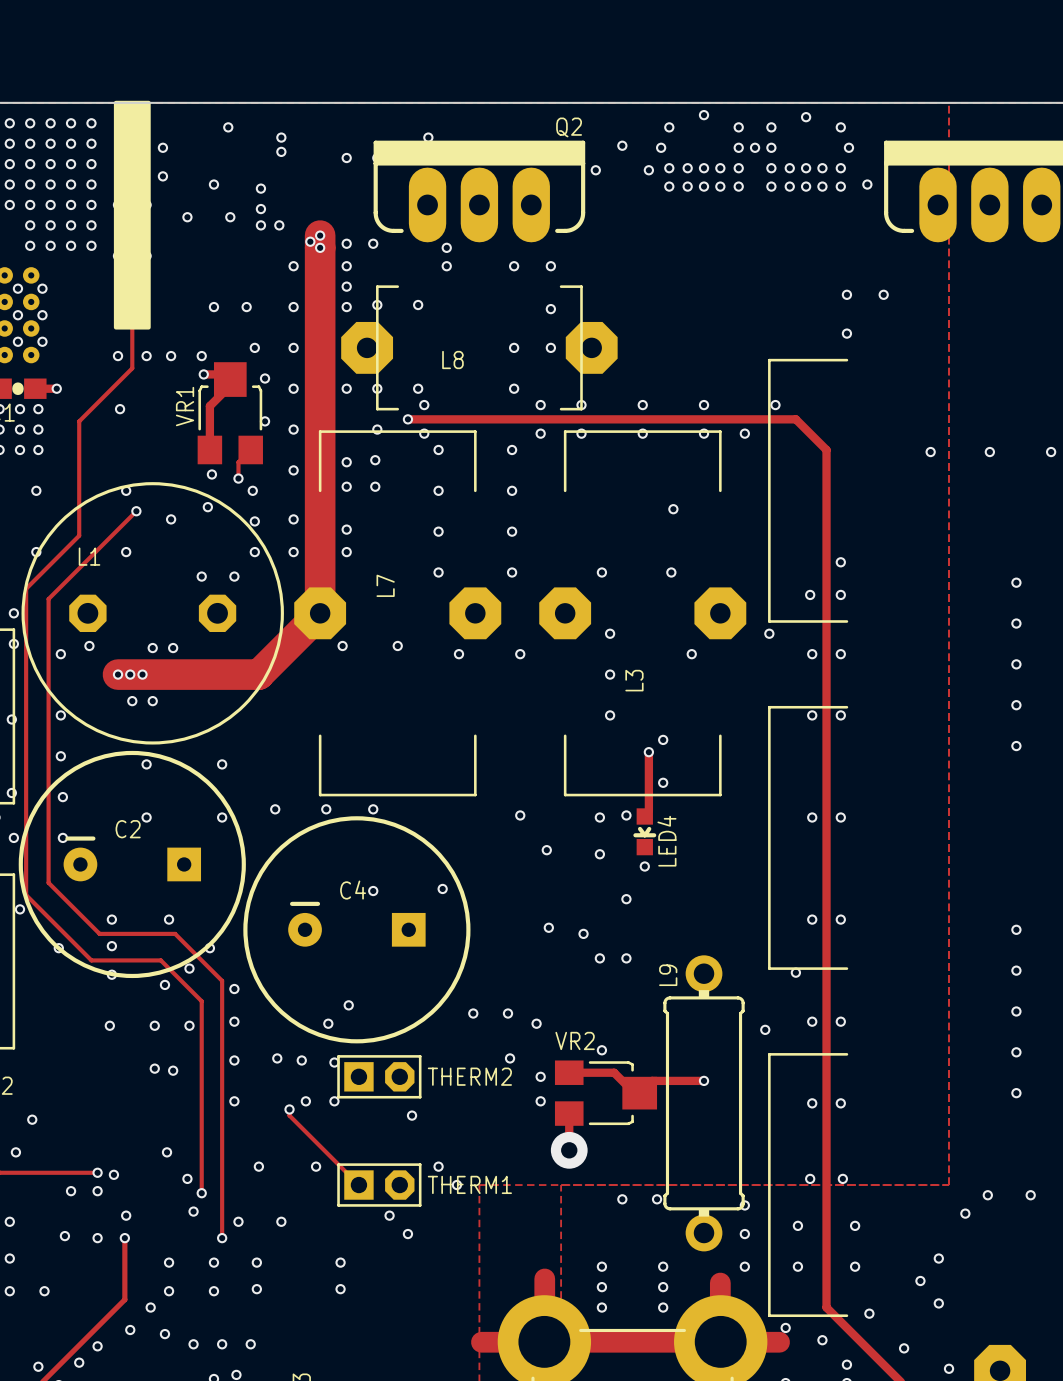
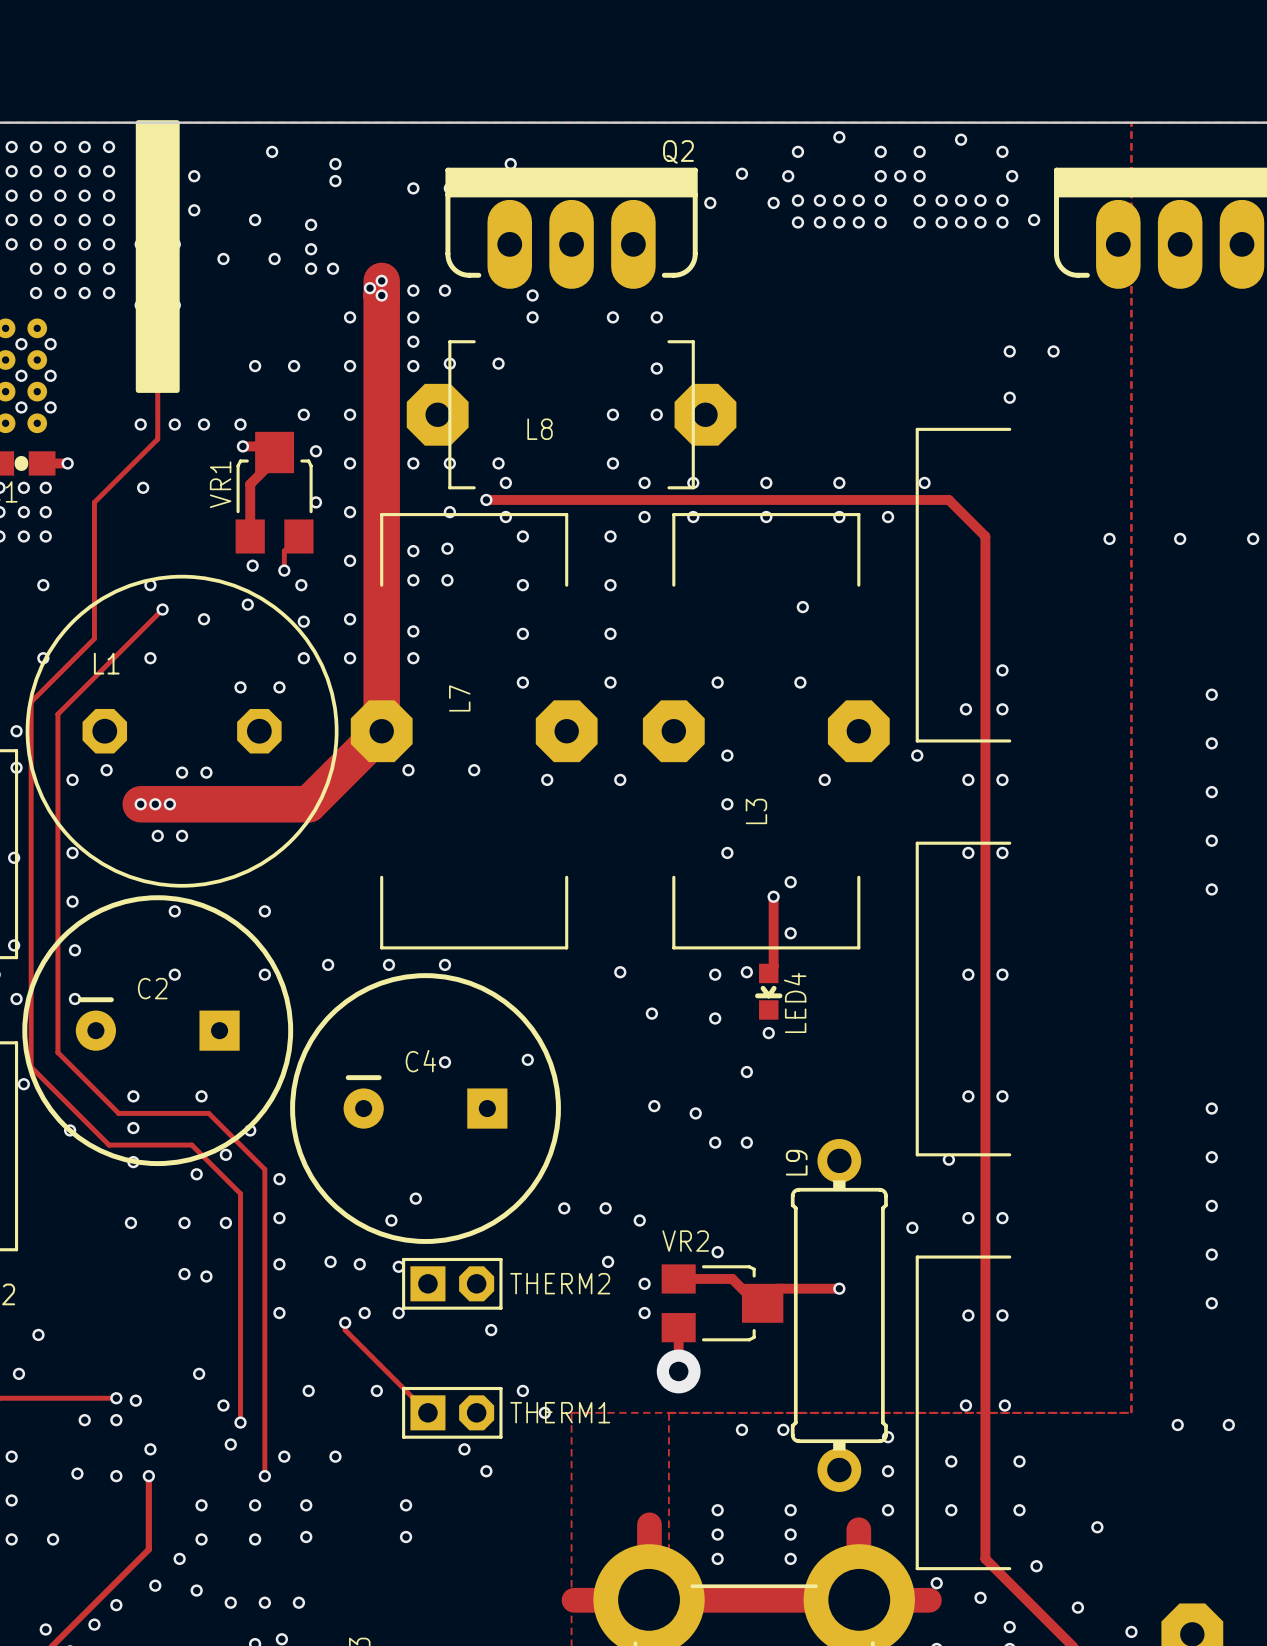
via: (965, 1213) -> none
via: (938, 1258) -> none
via: (938, 1303) -> none

